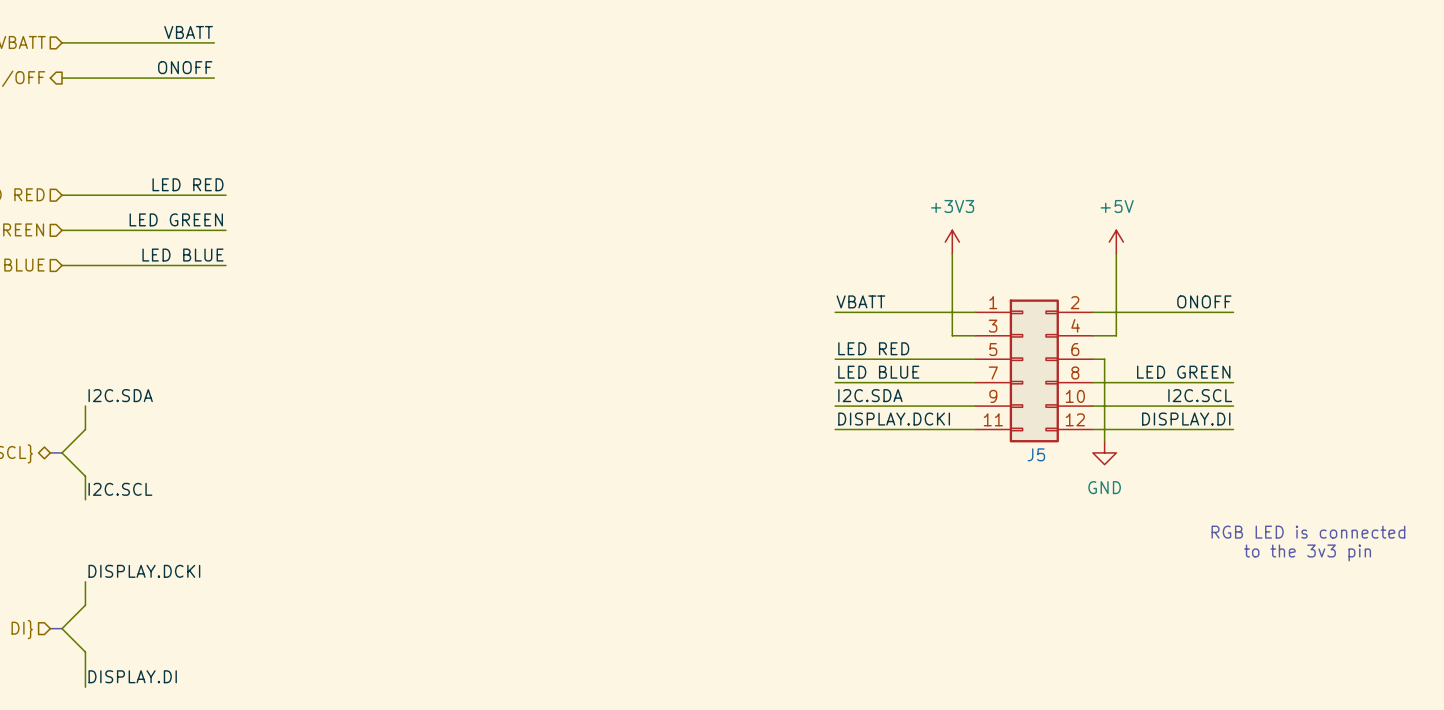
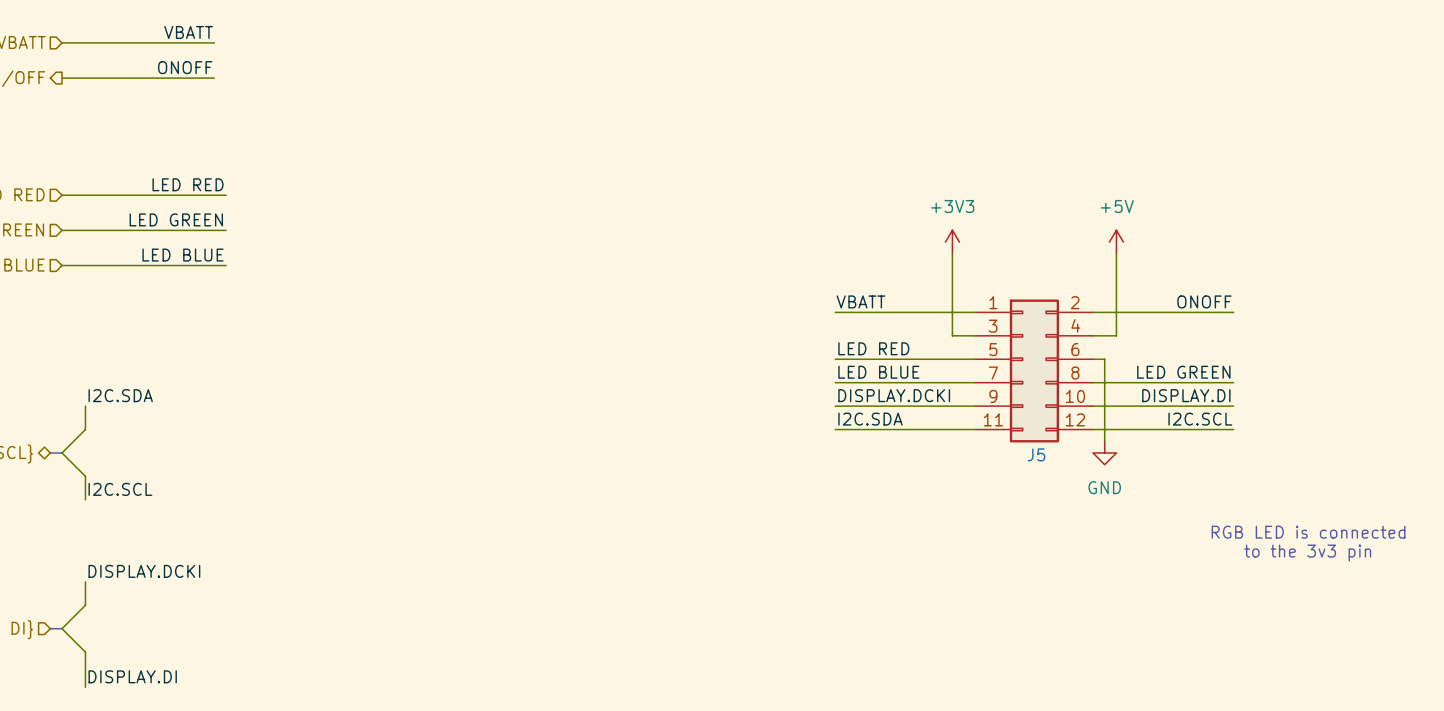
label: I2C.SDA (870, 395) -> DISPLAY.DCKI (894, 395)
label: I2C.SCL (1200, 395) -> DISPLAY.DI (1186, 395)
label: DISPLAY.DCKI (894, 419) -> I2C.SDA (870, 419)
label: DISPLAY.DI (1186, 419) -> I2C.SCL (1200, 419)

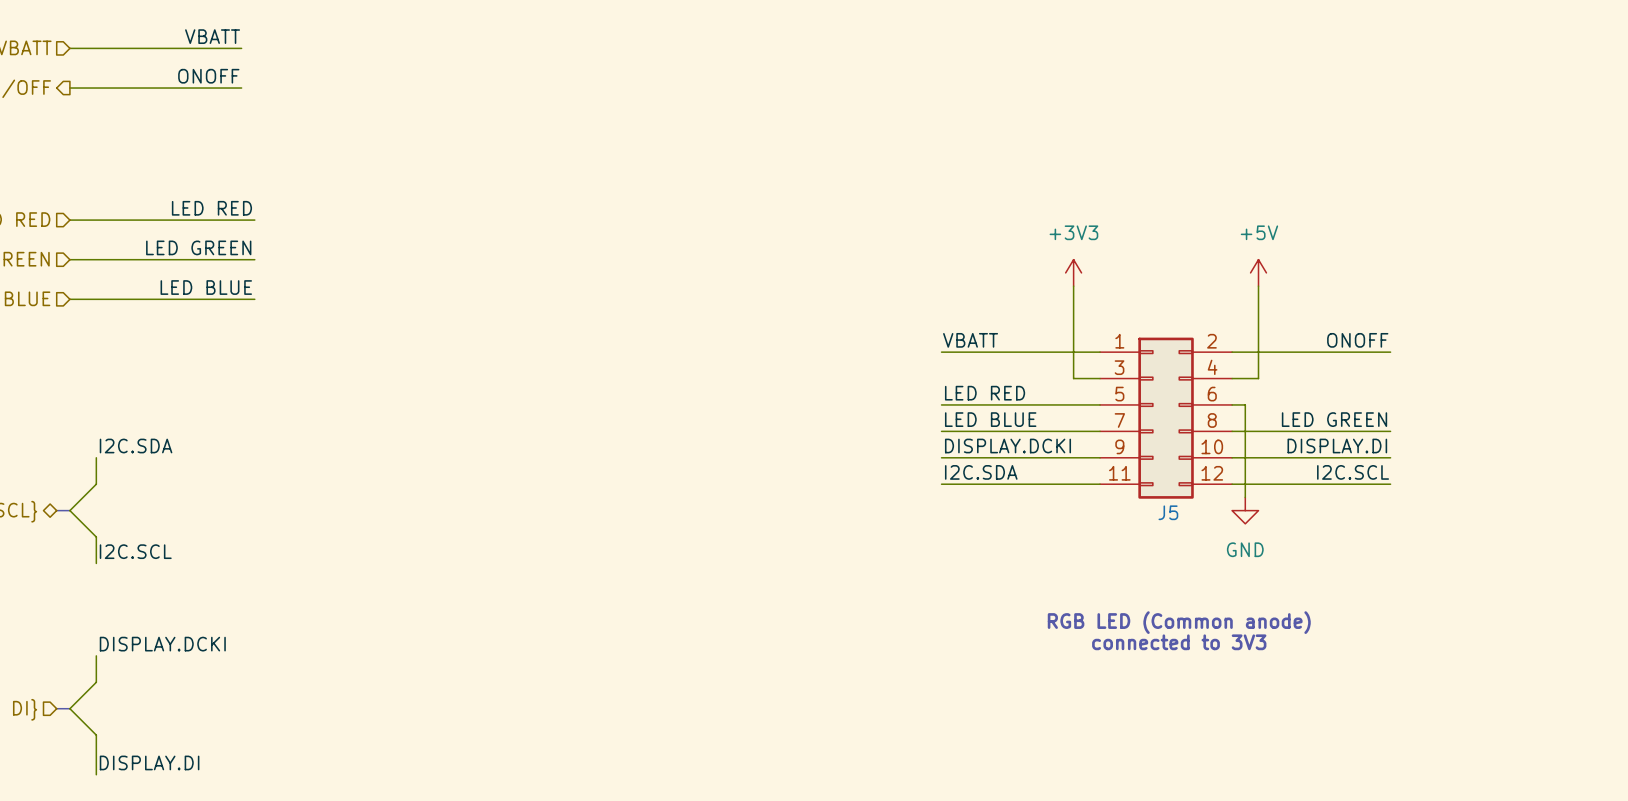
text: RGB LED is connected (1308, 532) -> none
text: none -> RGB LED (Common anode) (1179, 622)
text: to the 3v3 pin (1307, 552) -> none
text: none -> connected to 3V3 (1179, 642)

